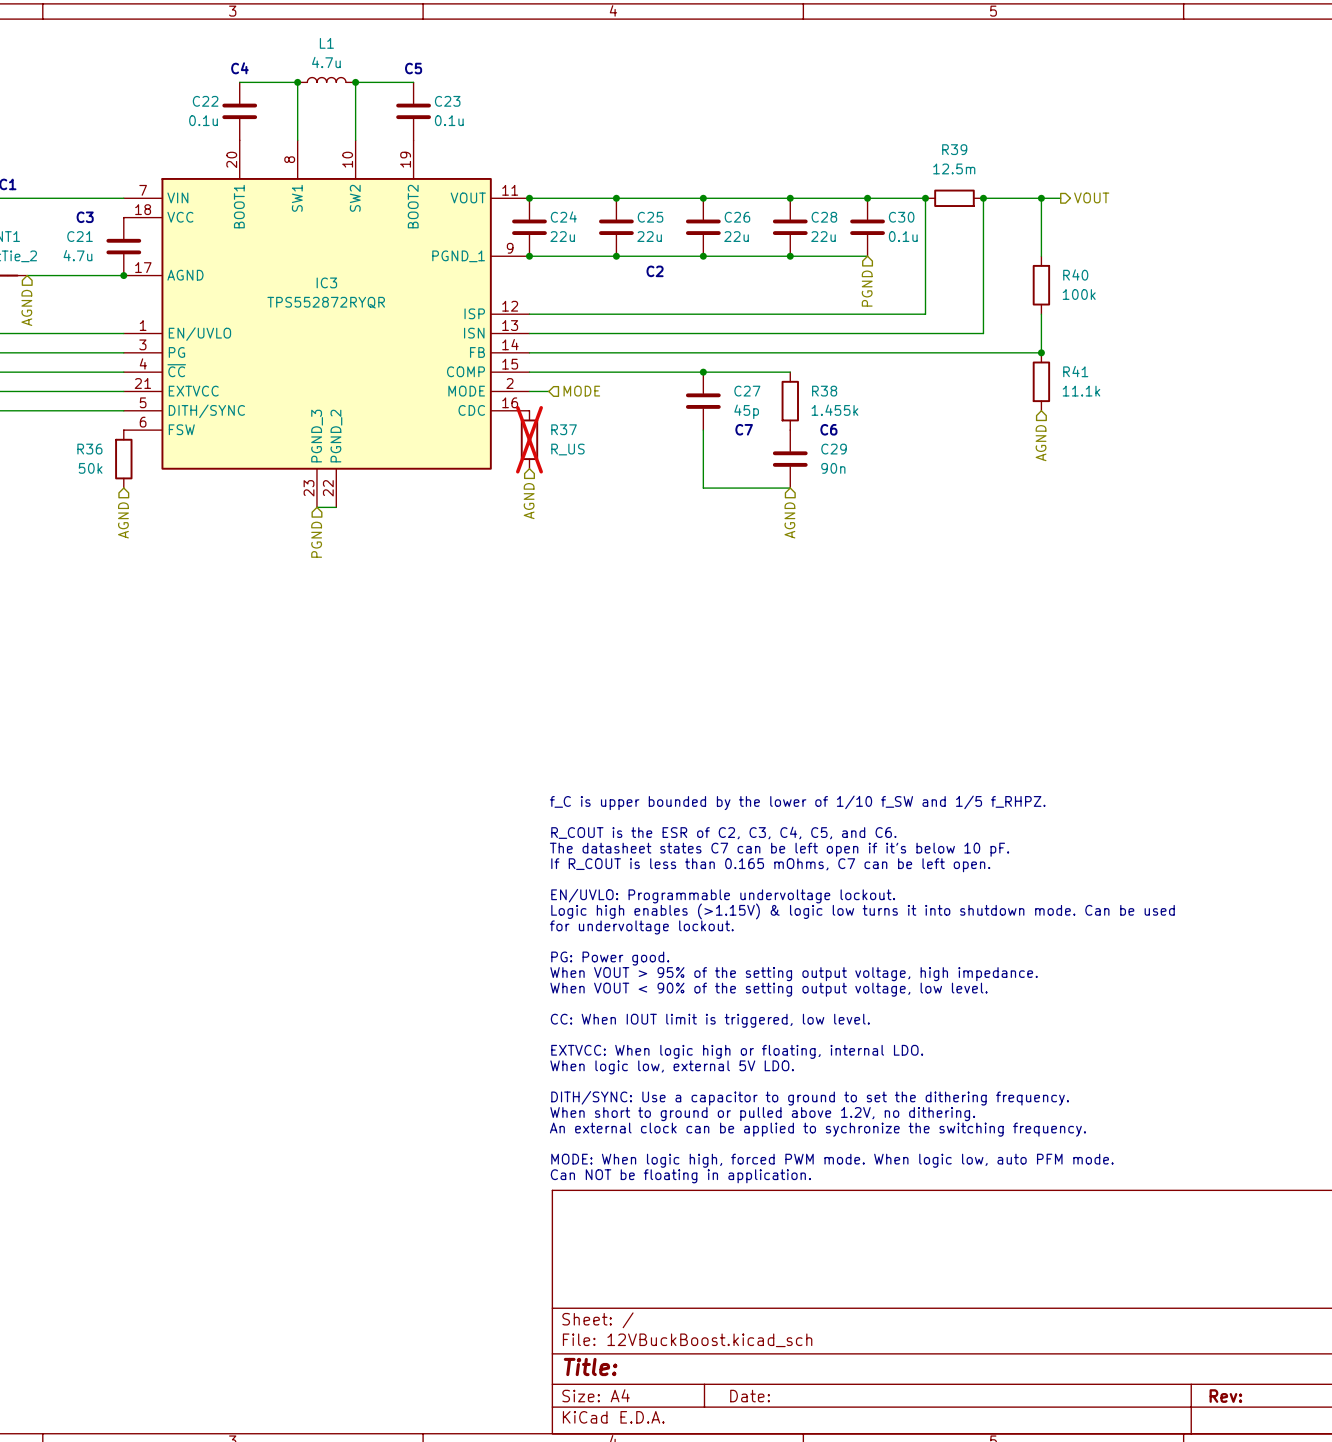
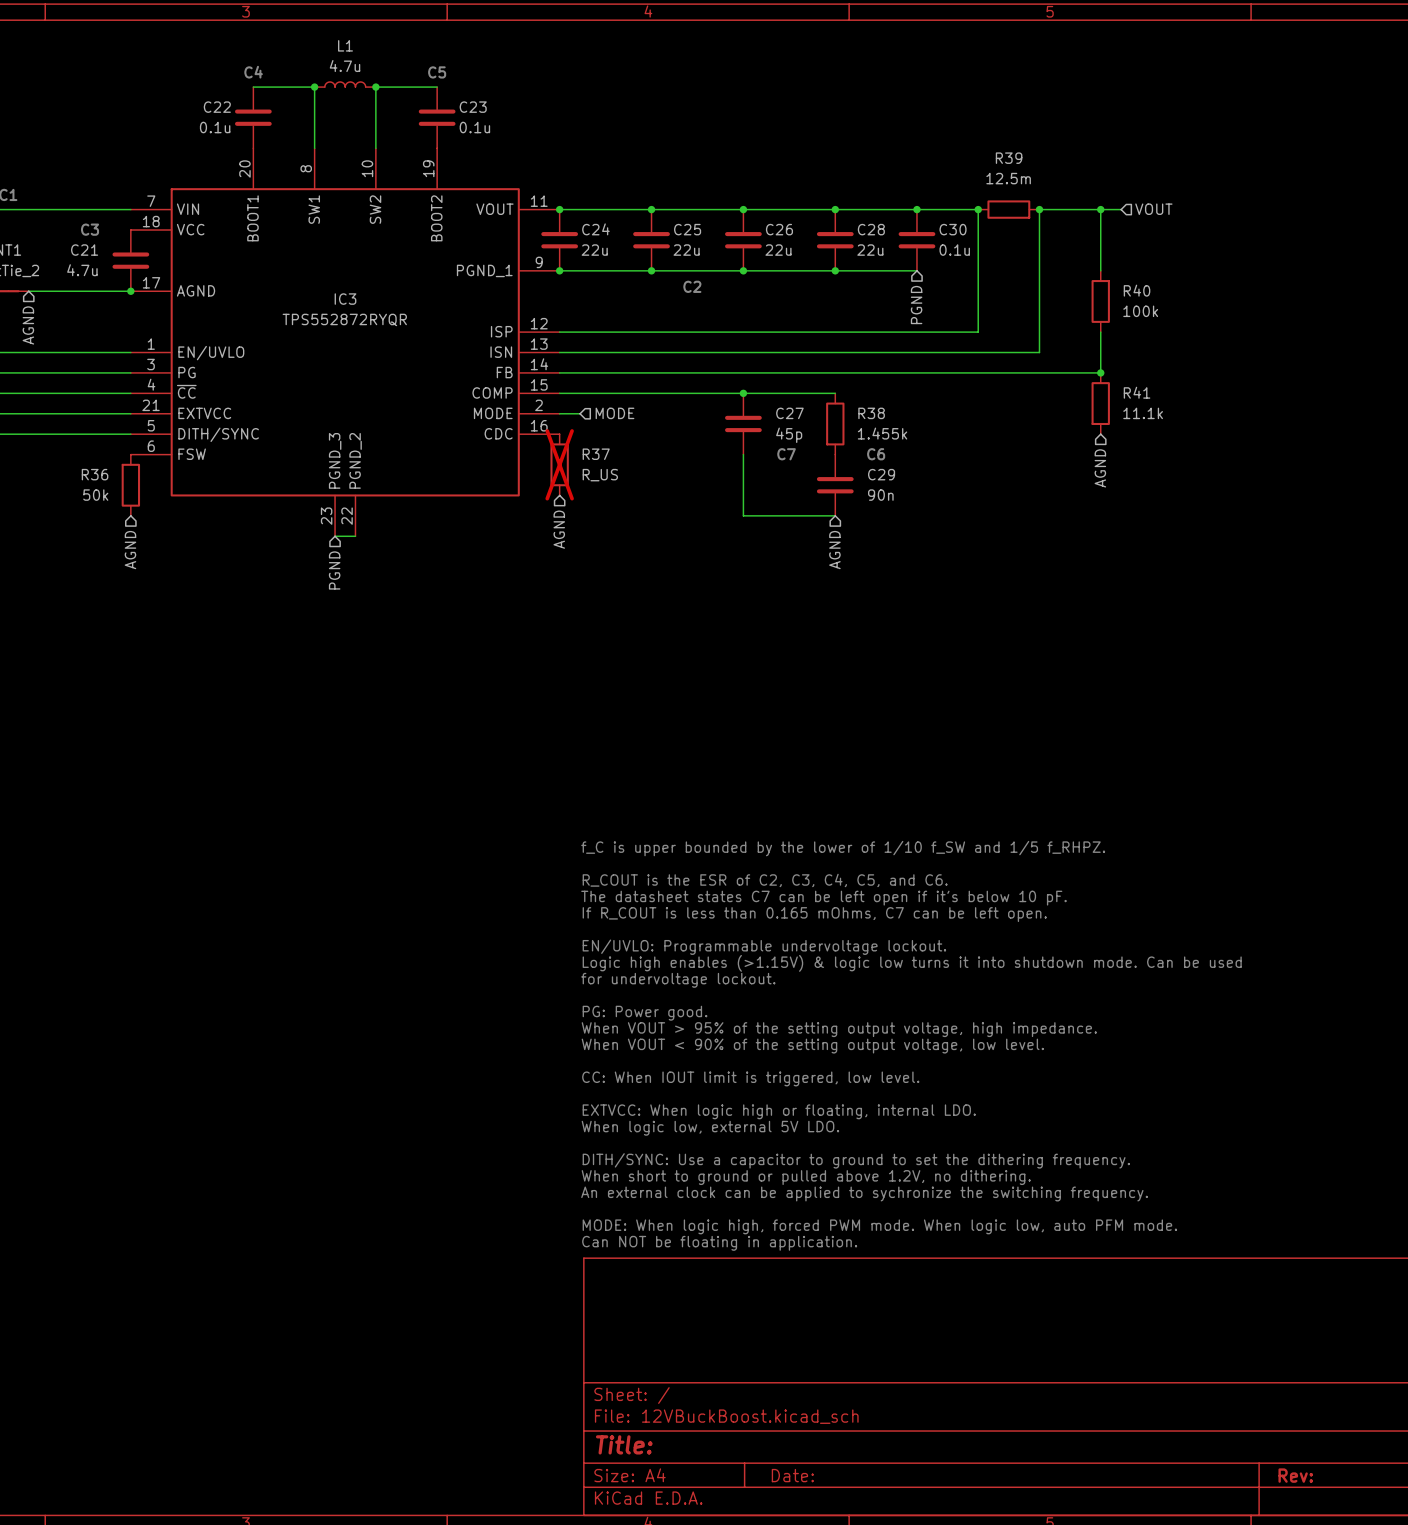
hierarchical label shape: output (1091, 197) -> input (1153, 209)

